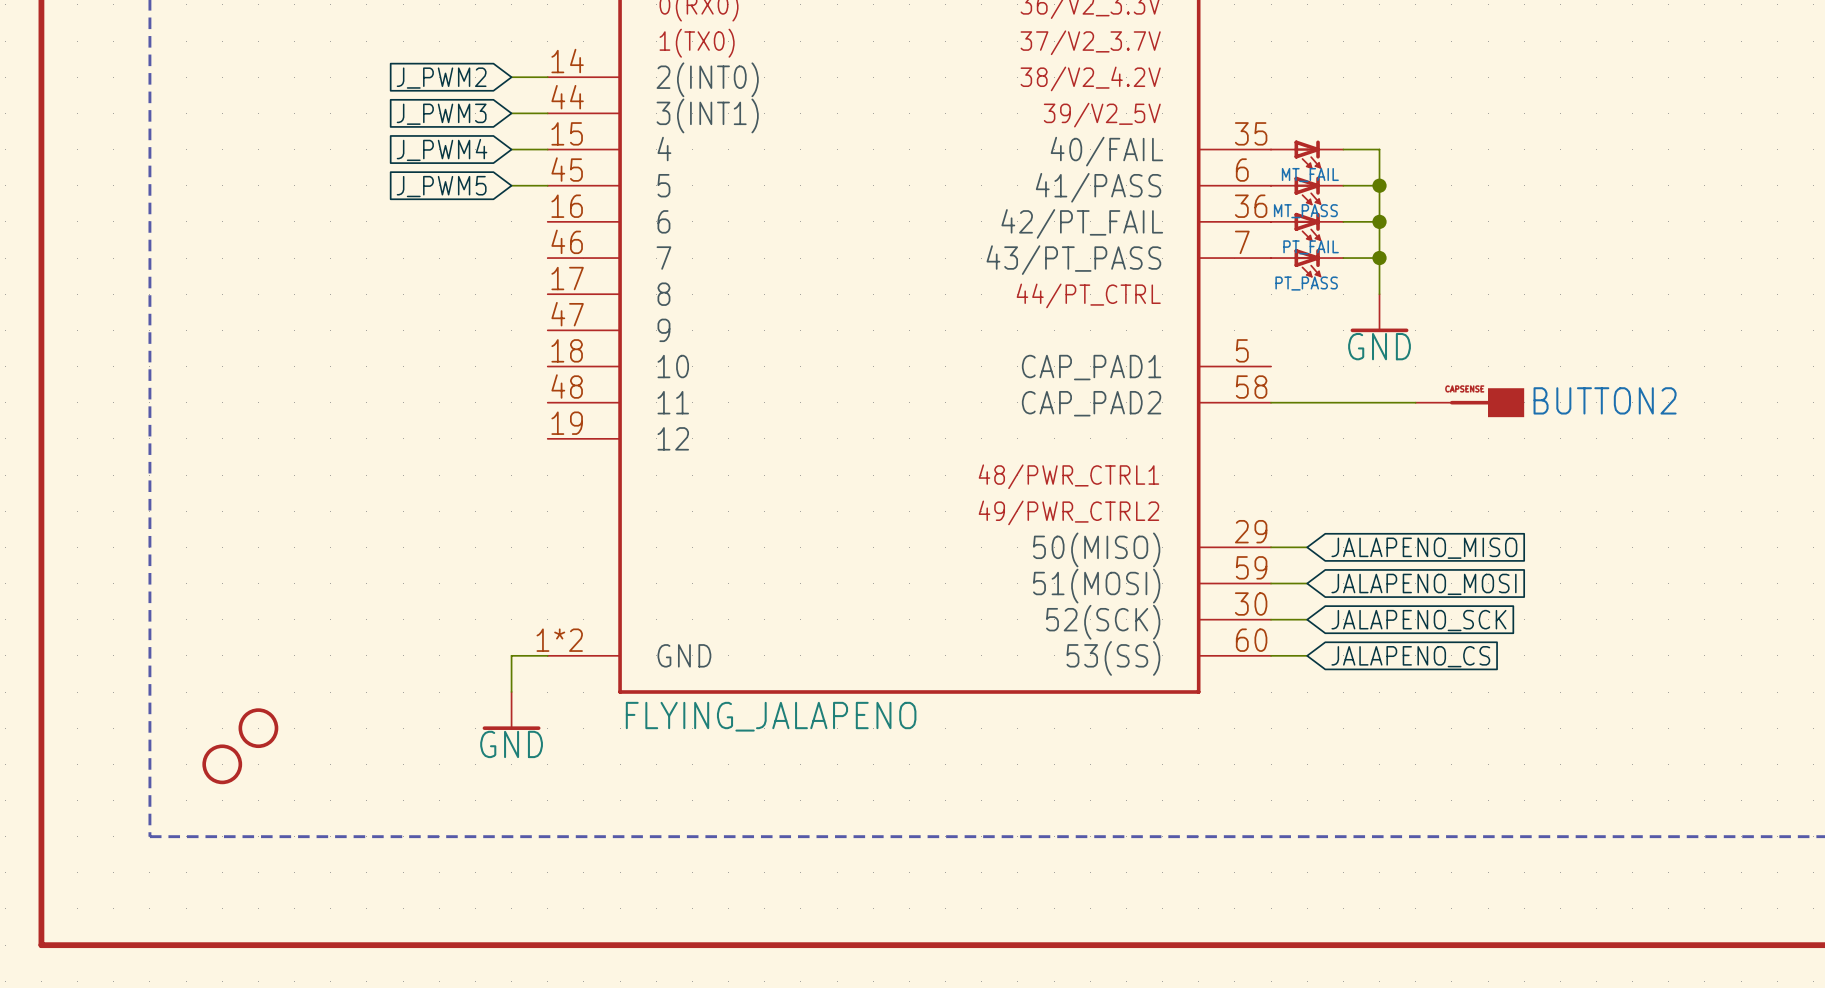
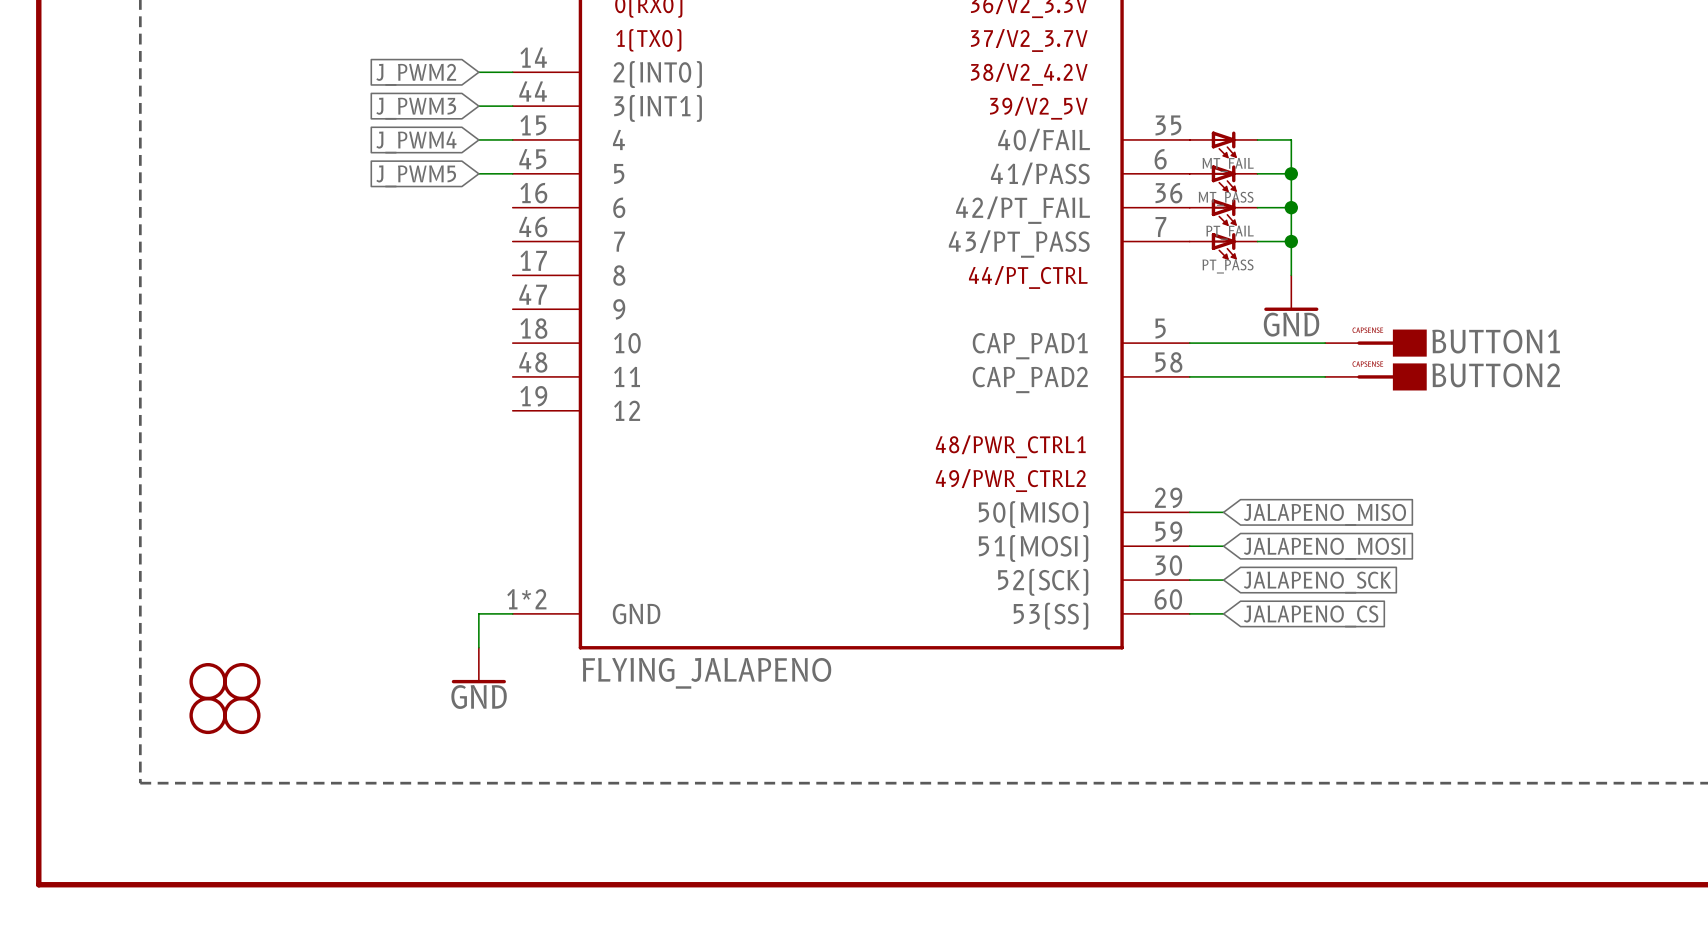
wire: none -> (1189, 343) (1325, 343)
BUTTON1: none -> (1375, 343)
part: none -> (208, 681)
part: none -> (241, 715)

